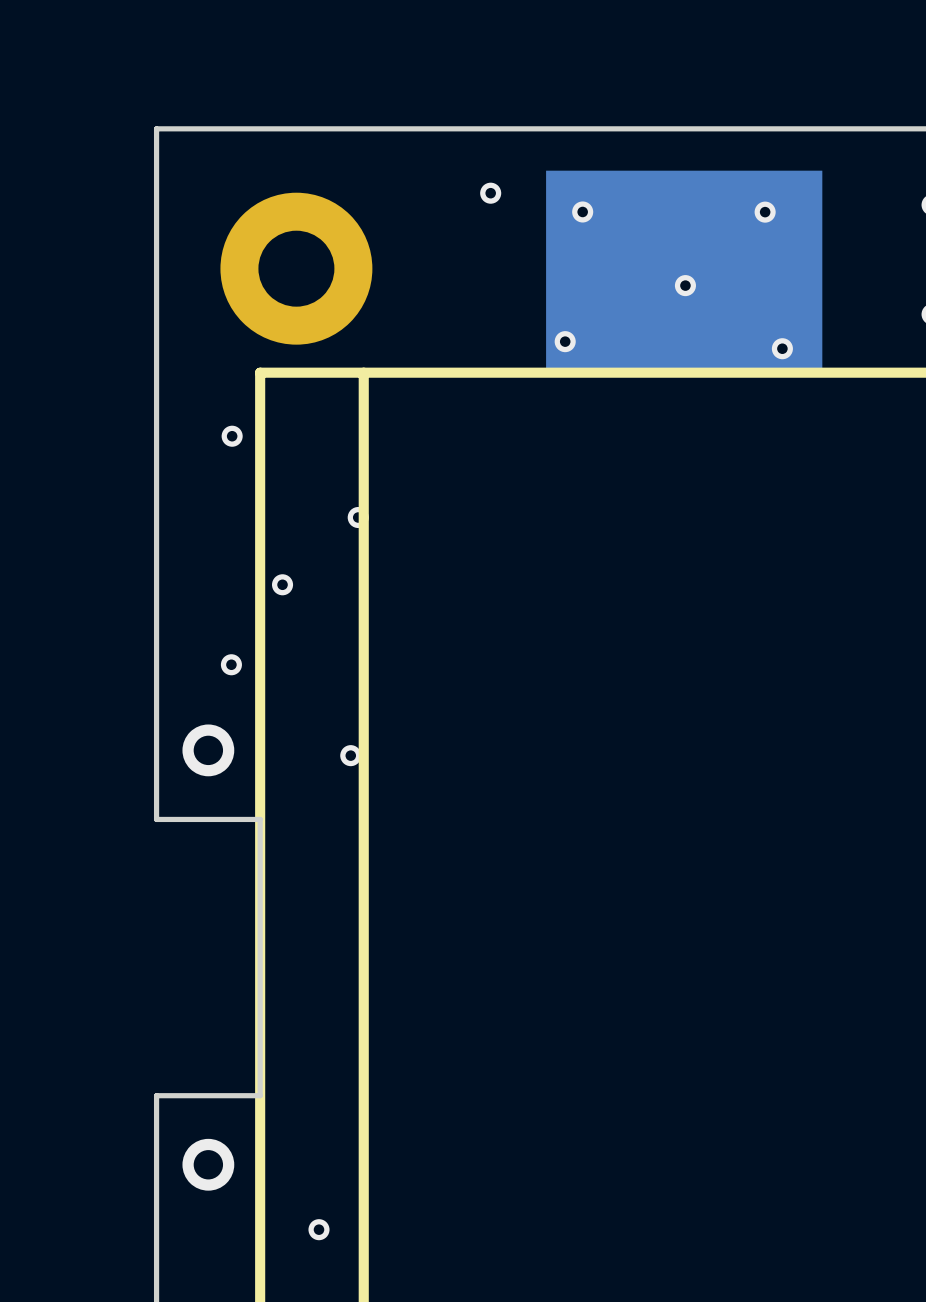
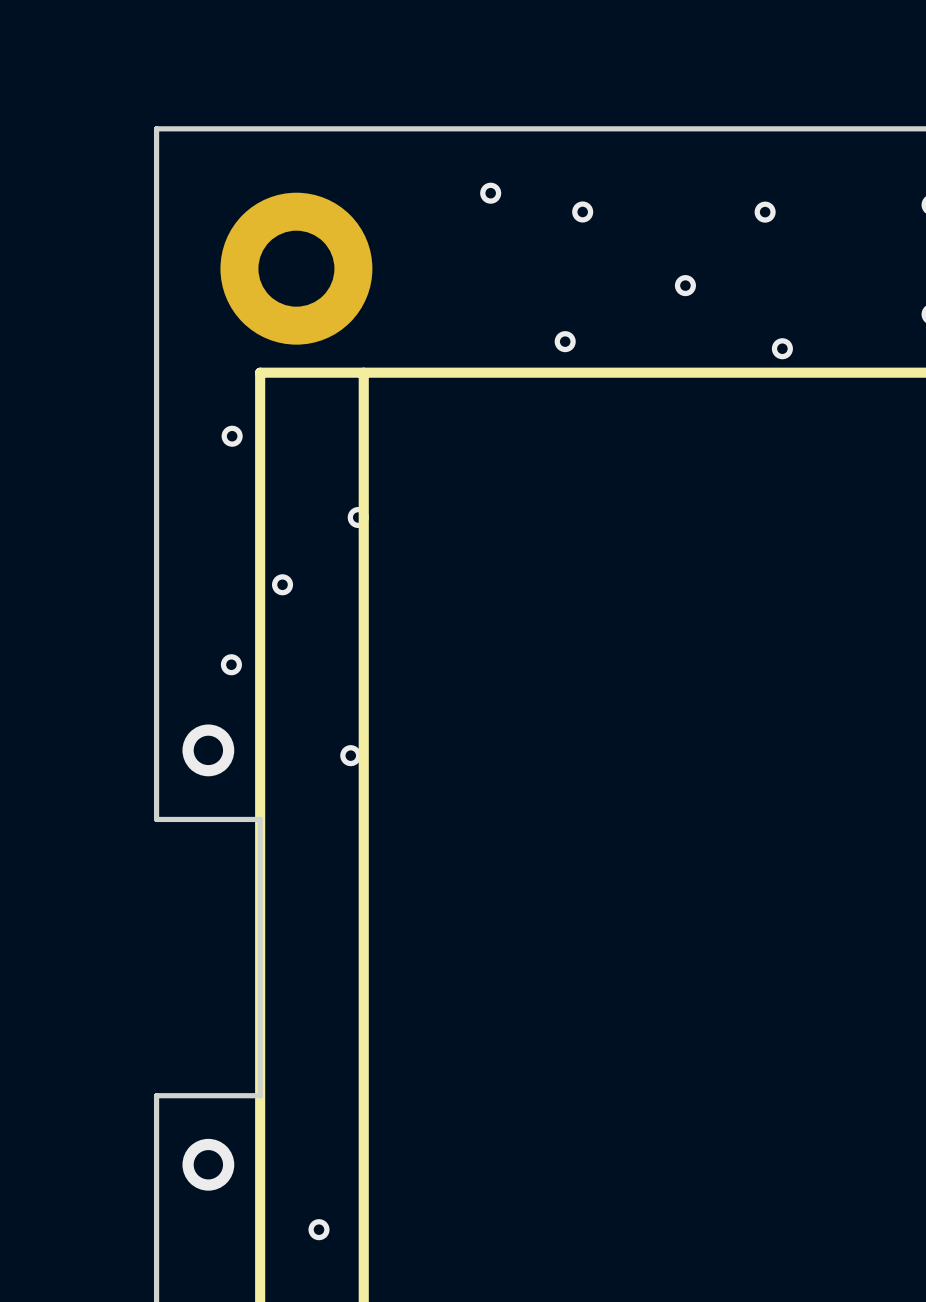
drawing: [546, 170, 823, 375] -> none

